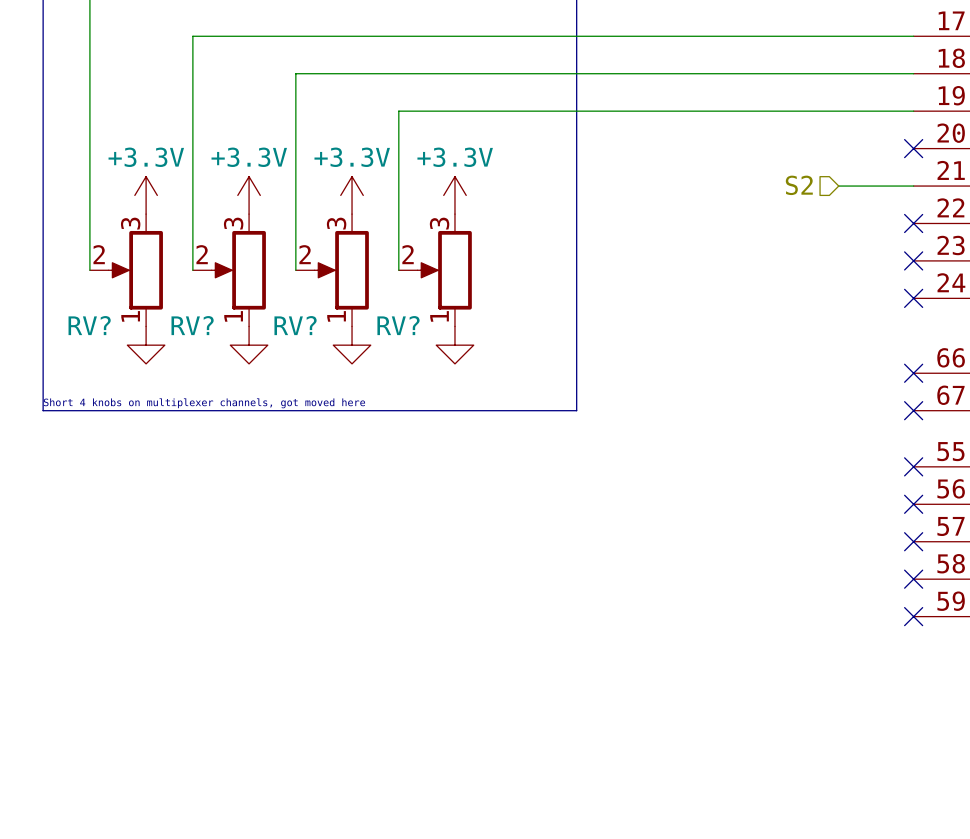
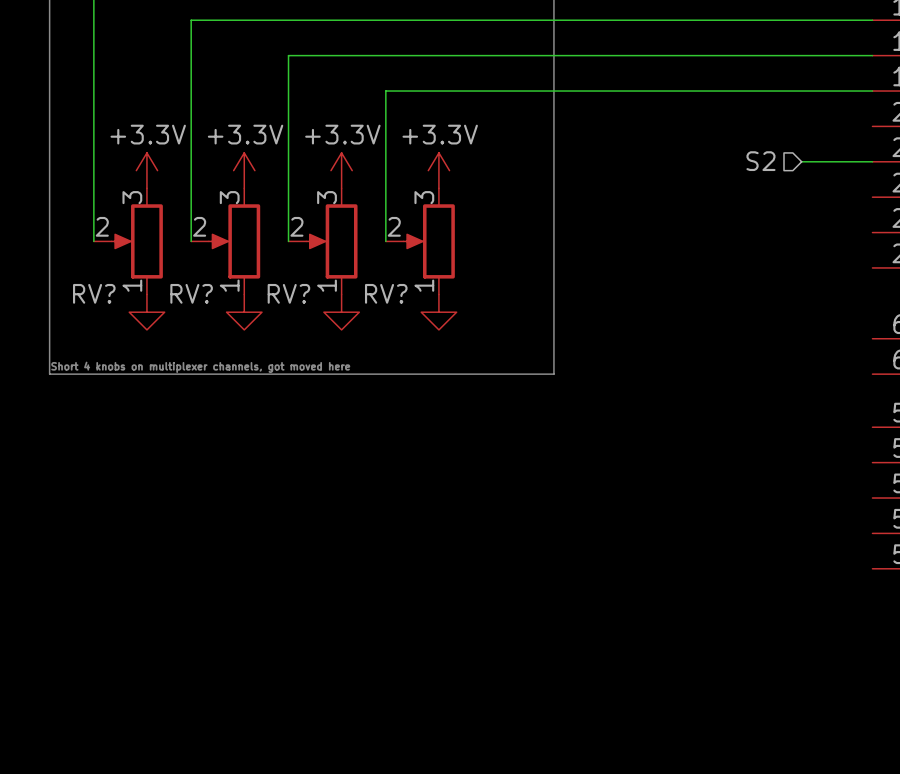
no-connect mark: (913, 148) -> none
no-connect mark: (913, 223) -> none
no-connect mark: (913, 260) -> none
no-connect mark: (913, 298) -> none
no-connect mark: (913, 373) -> none
no-connect mark: (913, 410) -> none
no-connect mark: (913, 466) -> none
no-connect mark: (913, 504) -> none
no-connect mark: (913, 541) -> none
no-connect mark: (913, 579) -> none
no-connect mark: (913, 616) -> none

